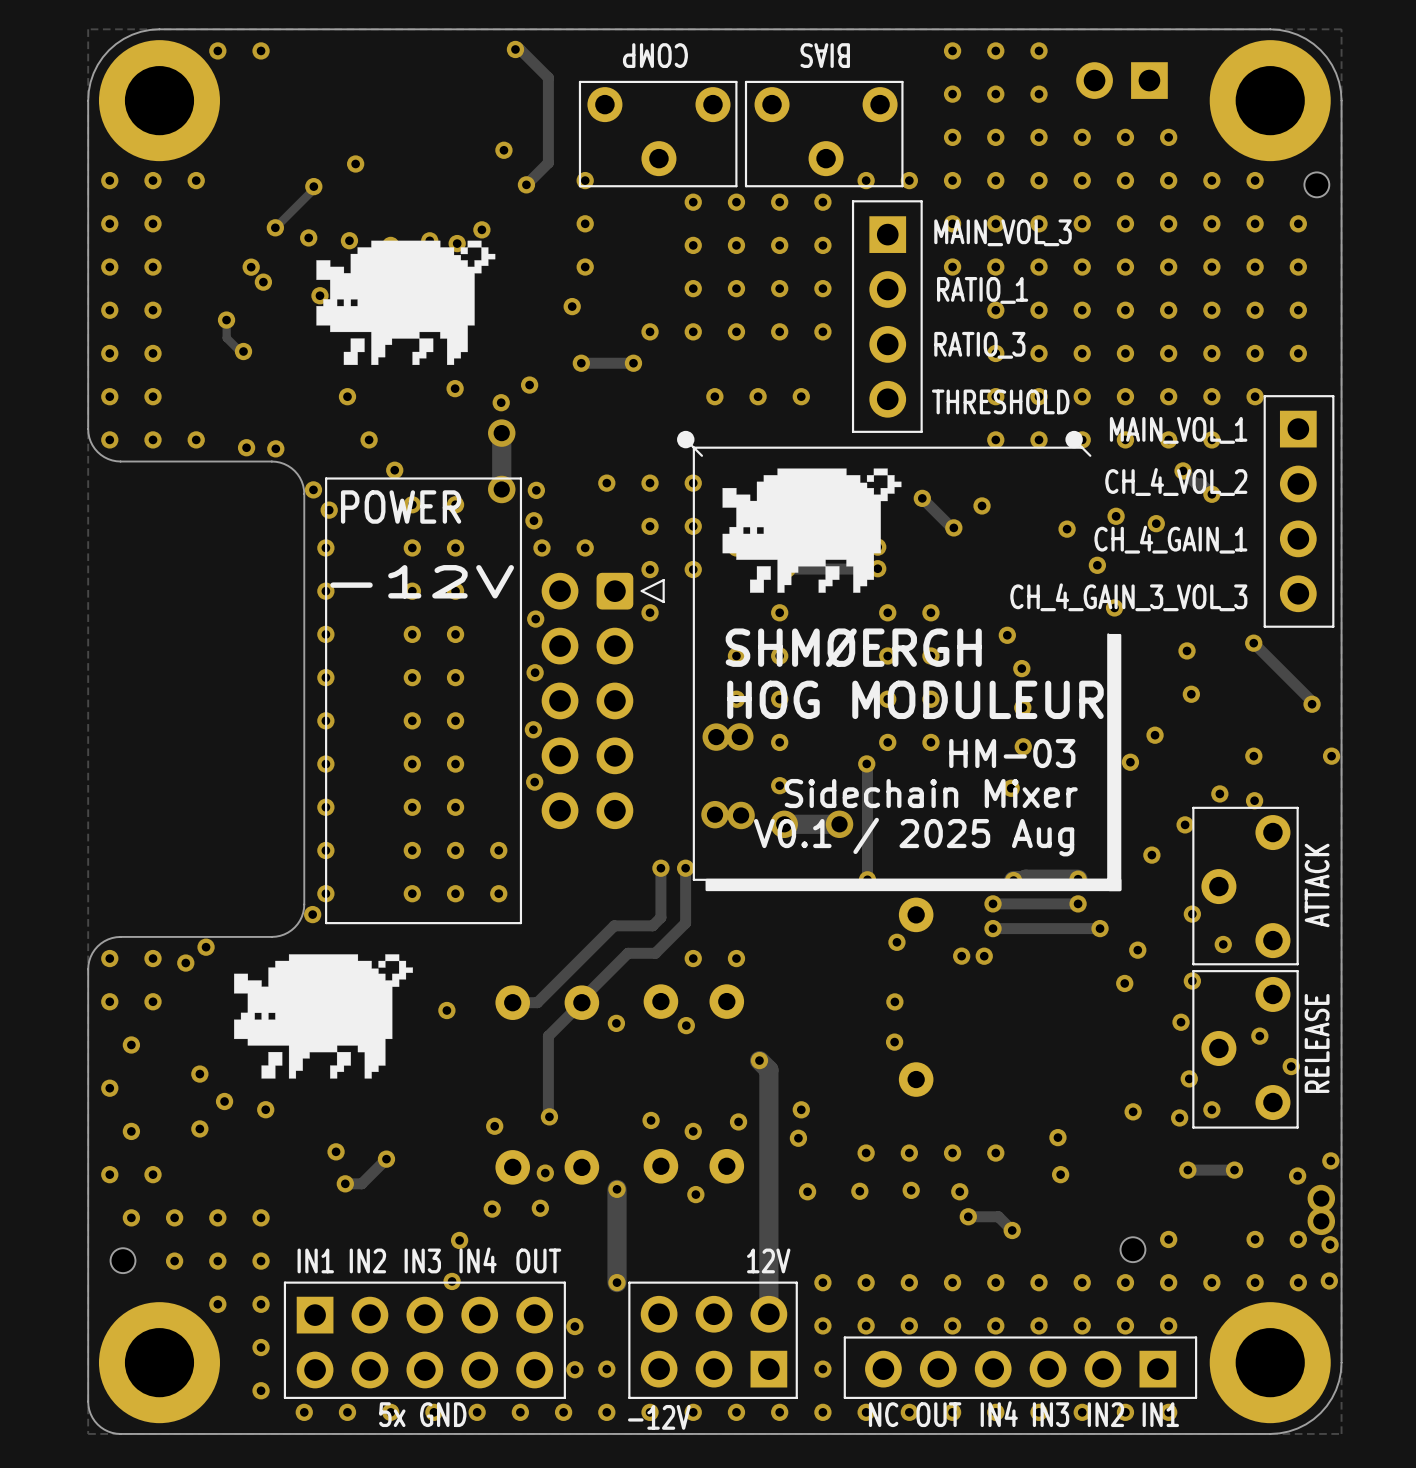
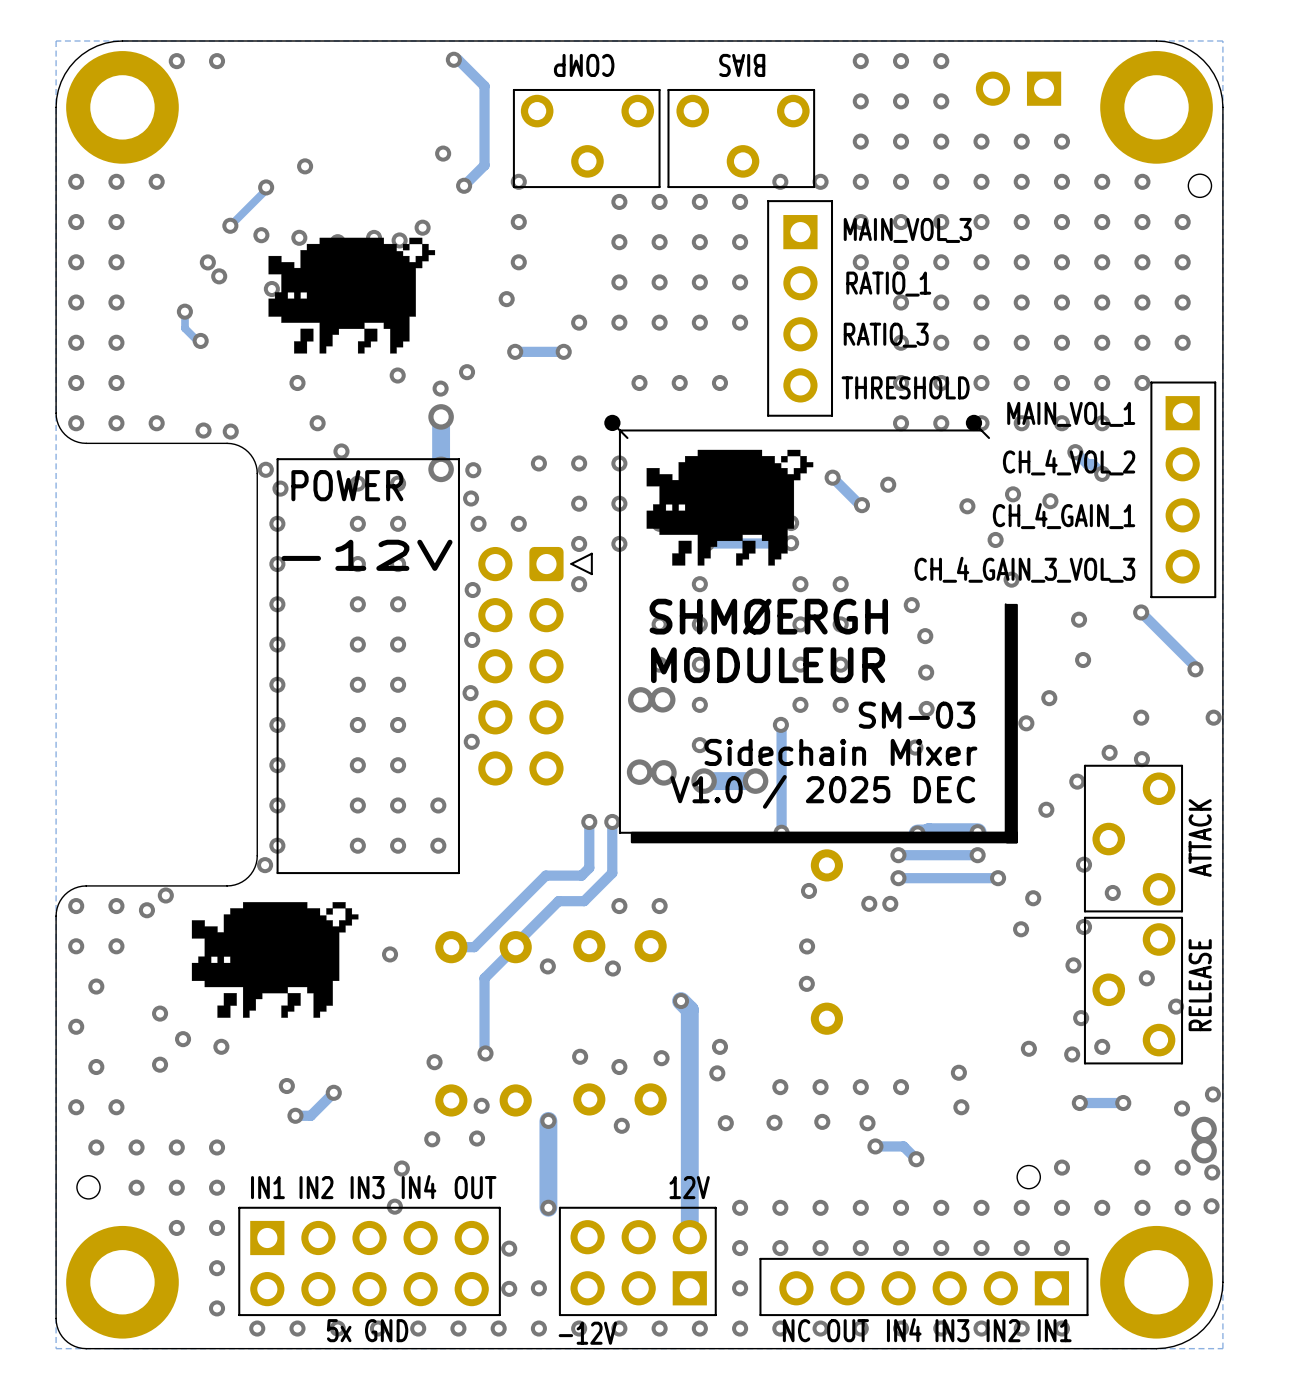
text: HOG MODULEUR (915, 699) -> MODULEUR (768, 665)
text: HM-03 (1012, 753) -> SM-03 (916, 715)
text: V0.1 / 2025 Aug (914, 837) -> V1.0 / 2025 DEC (822, 791)

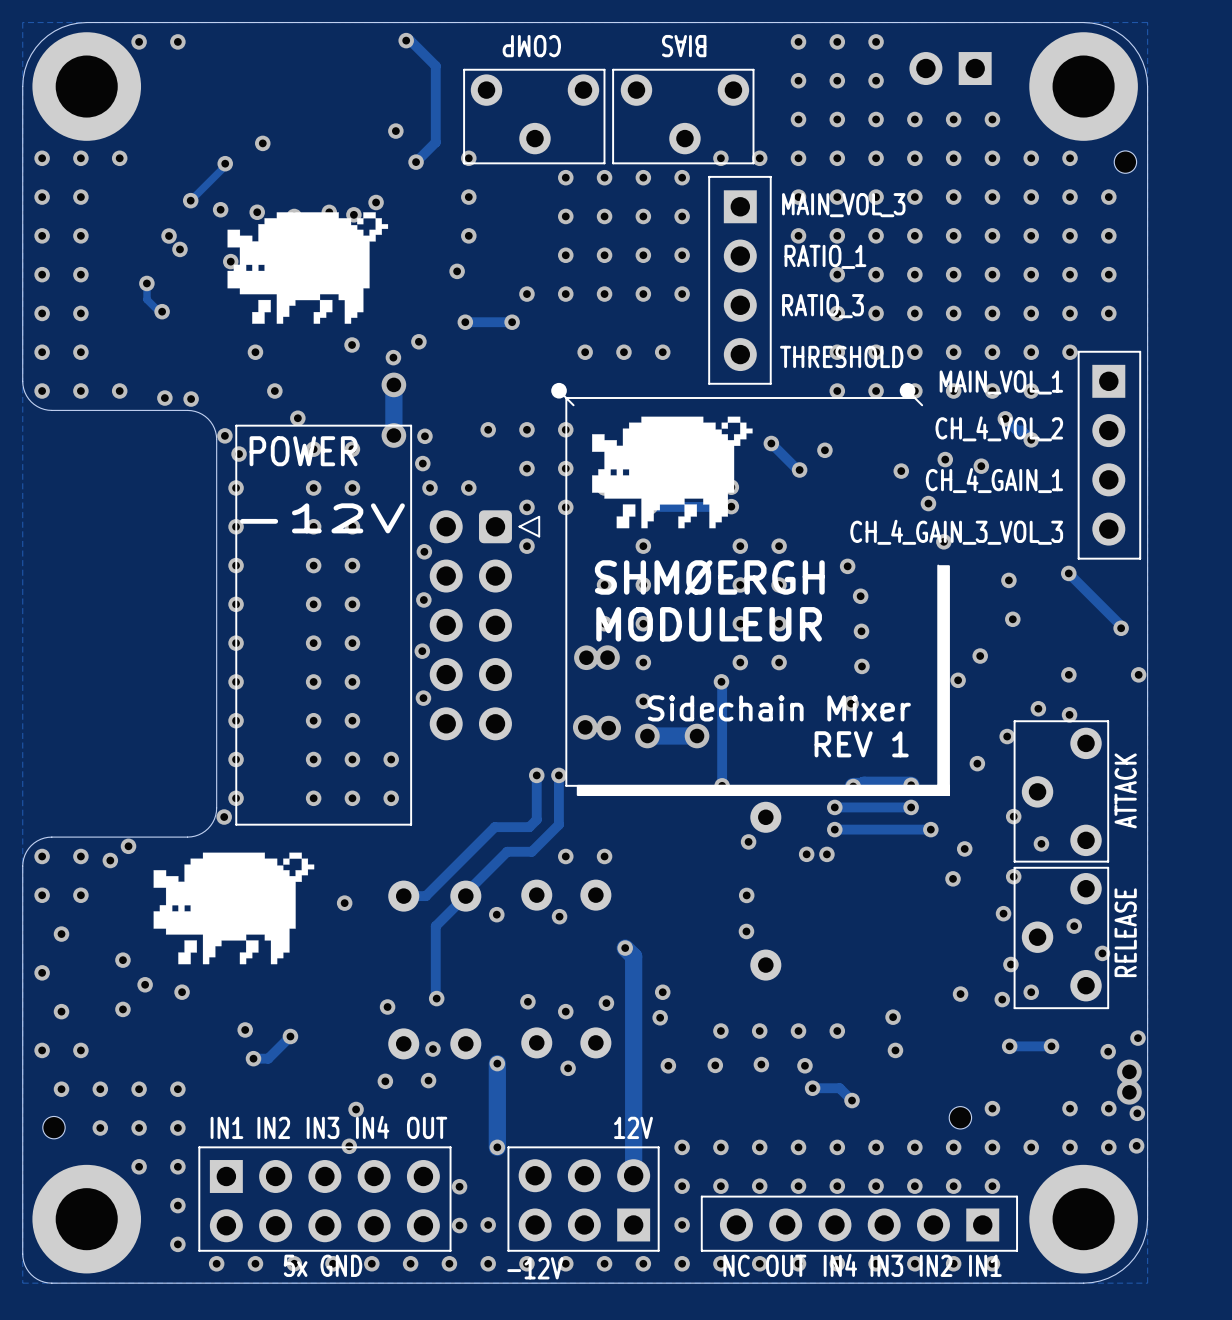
text: SM-03 (916, 715) -> none
text: V1.0 / 2025 DEC (822, 791) -> REV 1 (861, 744)

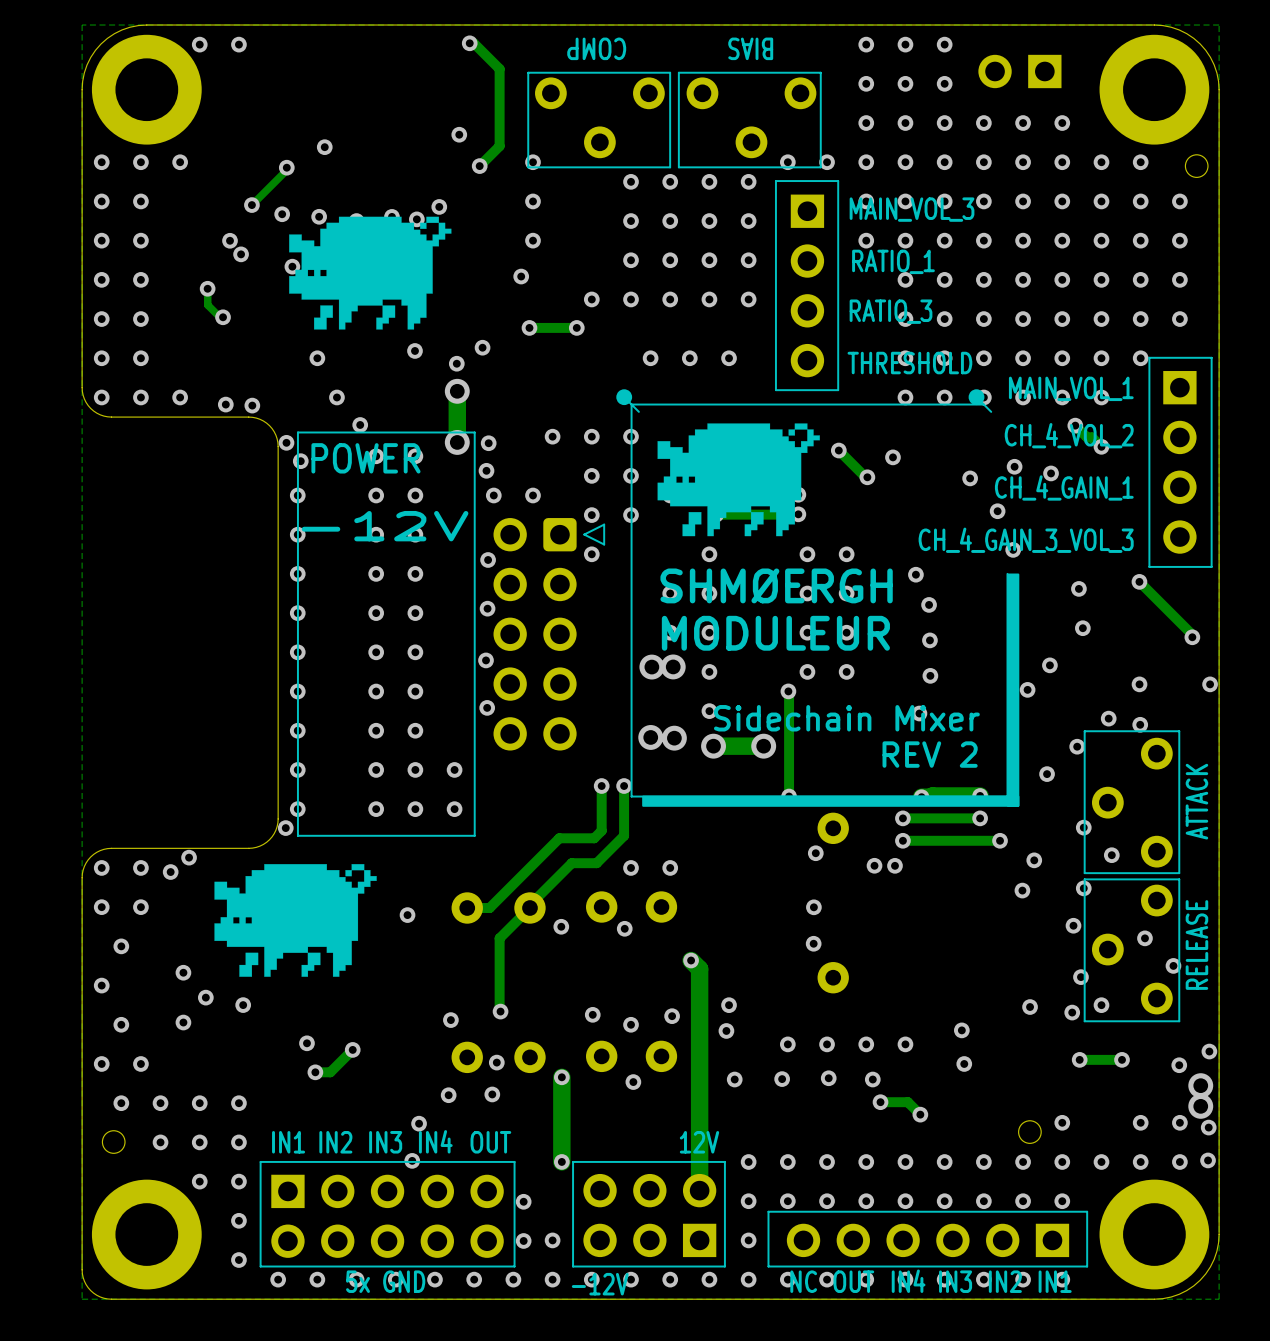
text: REV 1 (861, 744) -> REV 2 (930, 754)

